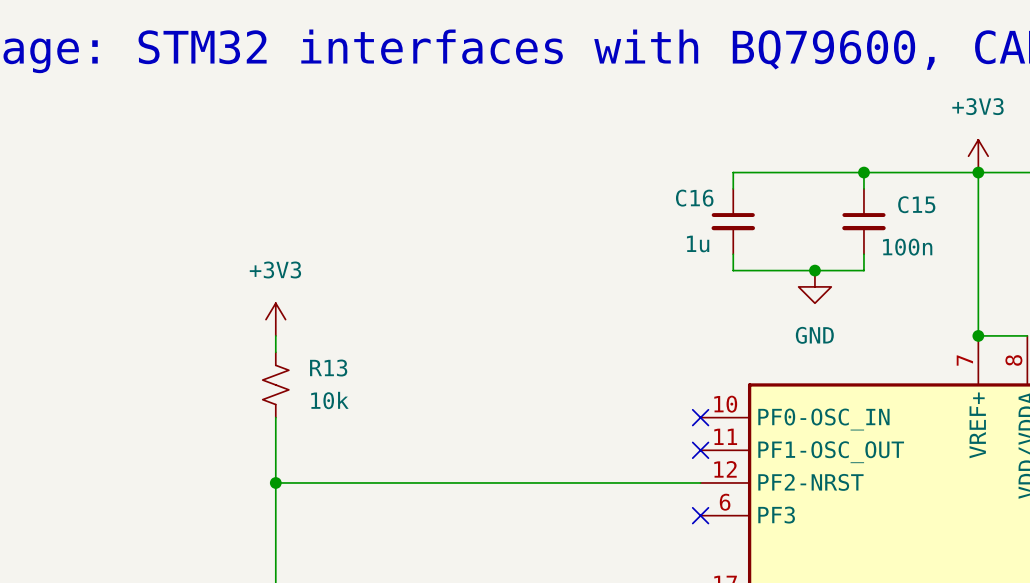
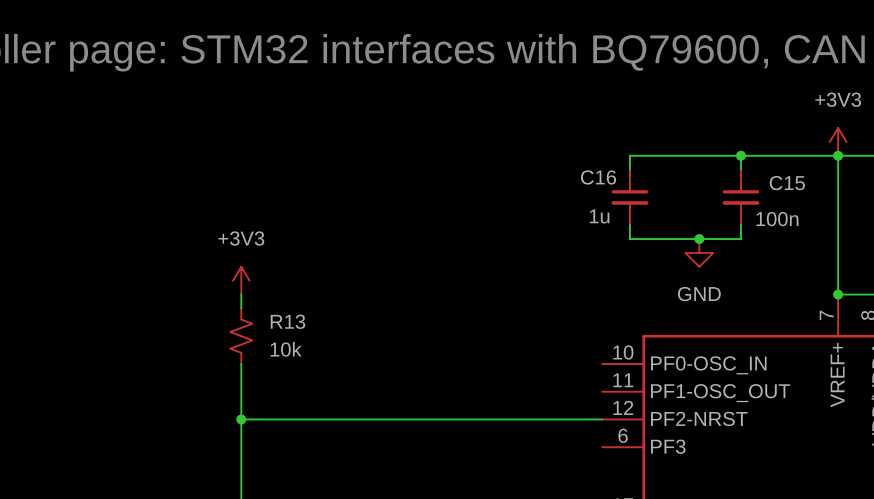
no-connect mark: (700, 417) -> none
no-connect mark: (700, 450) -> none
no-connect mark: (700, 515) -> none

